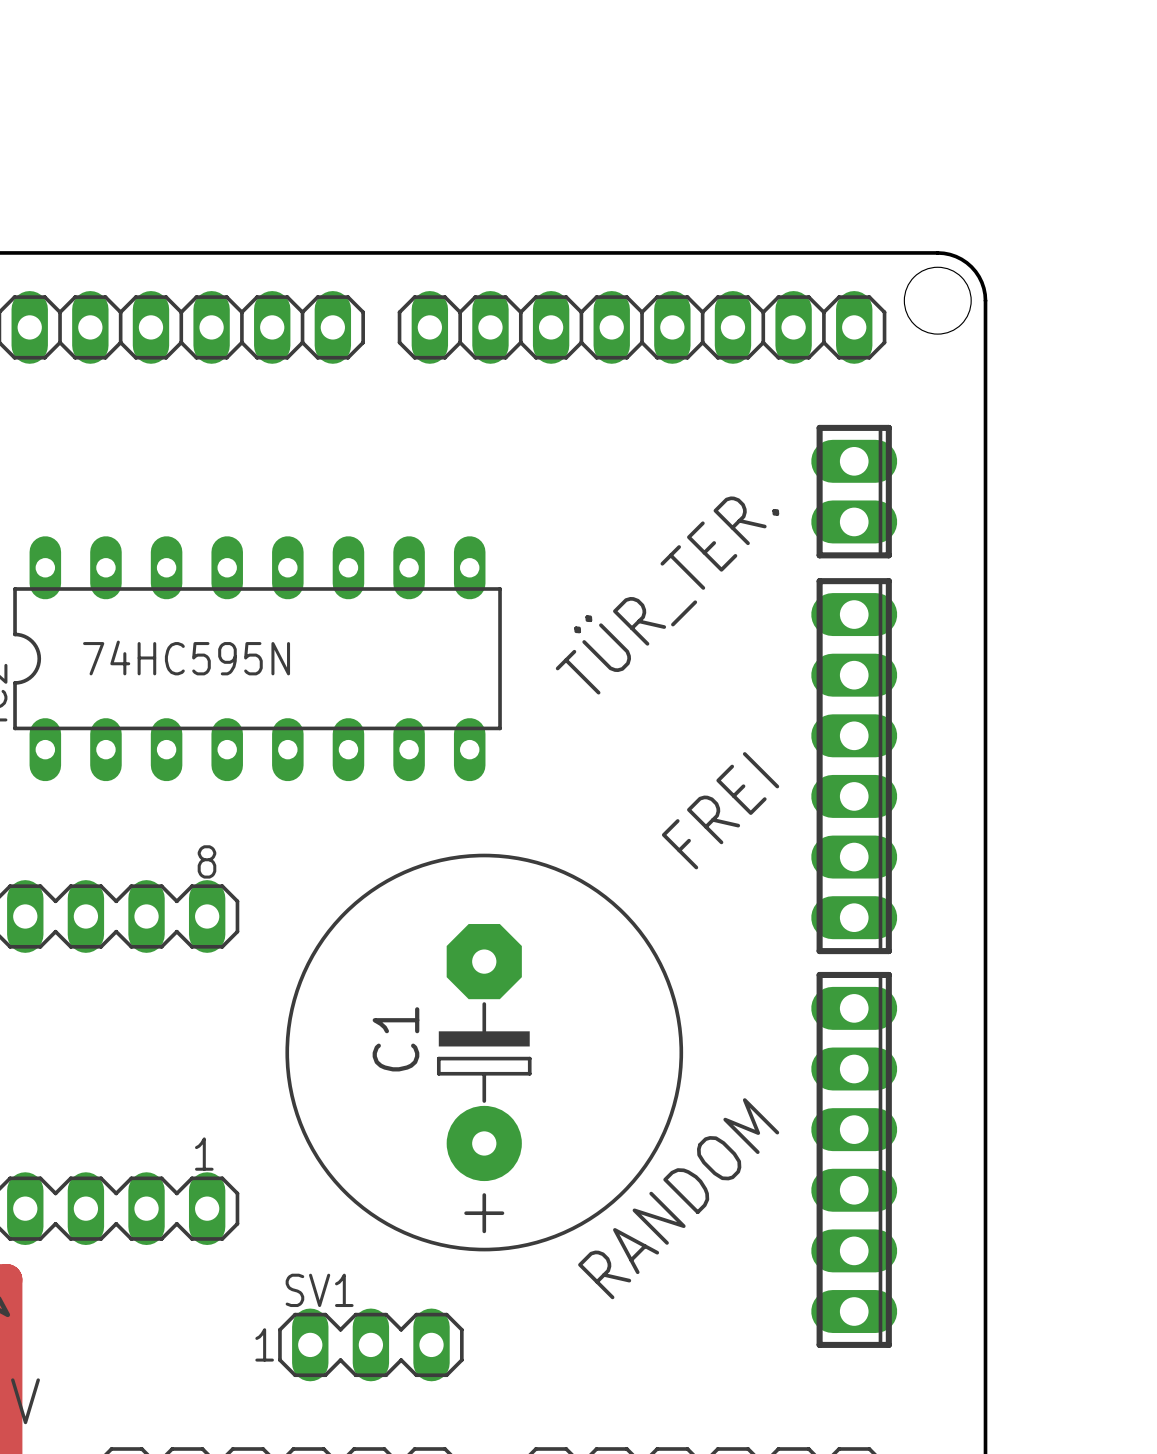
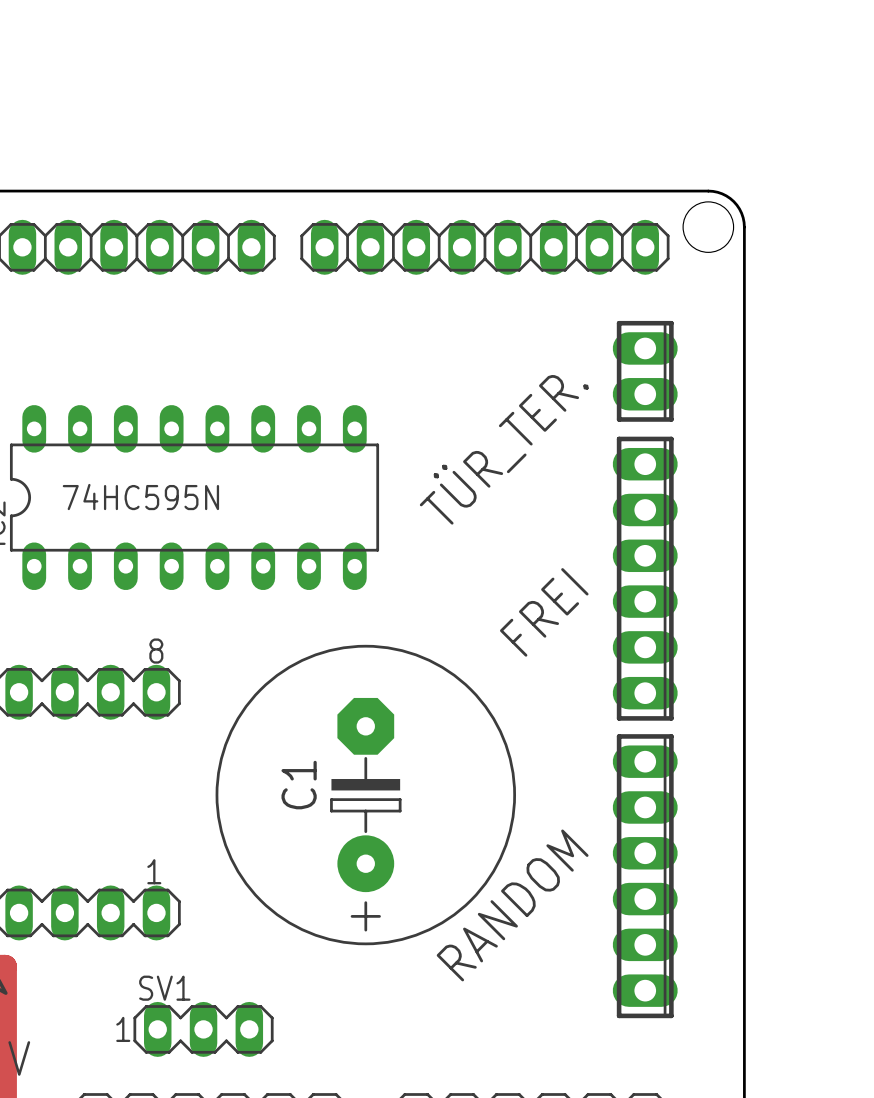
SV1 position: (370, 1344) -> (203, 1029)

